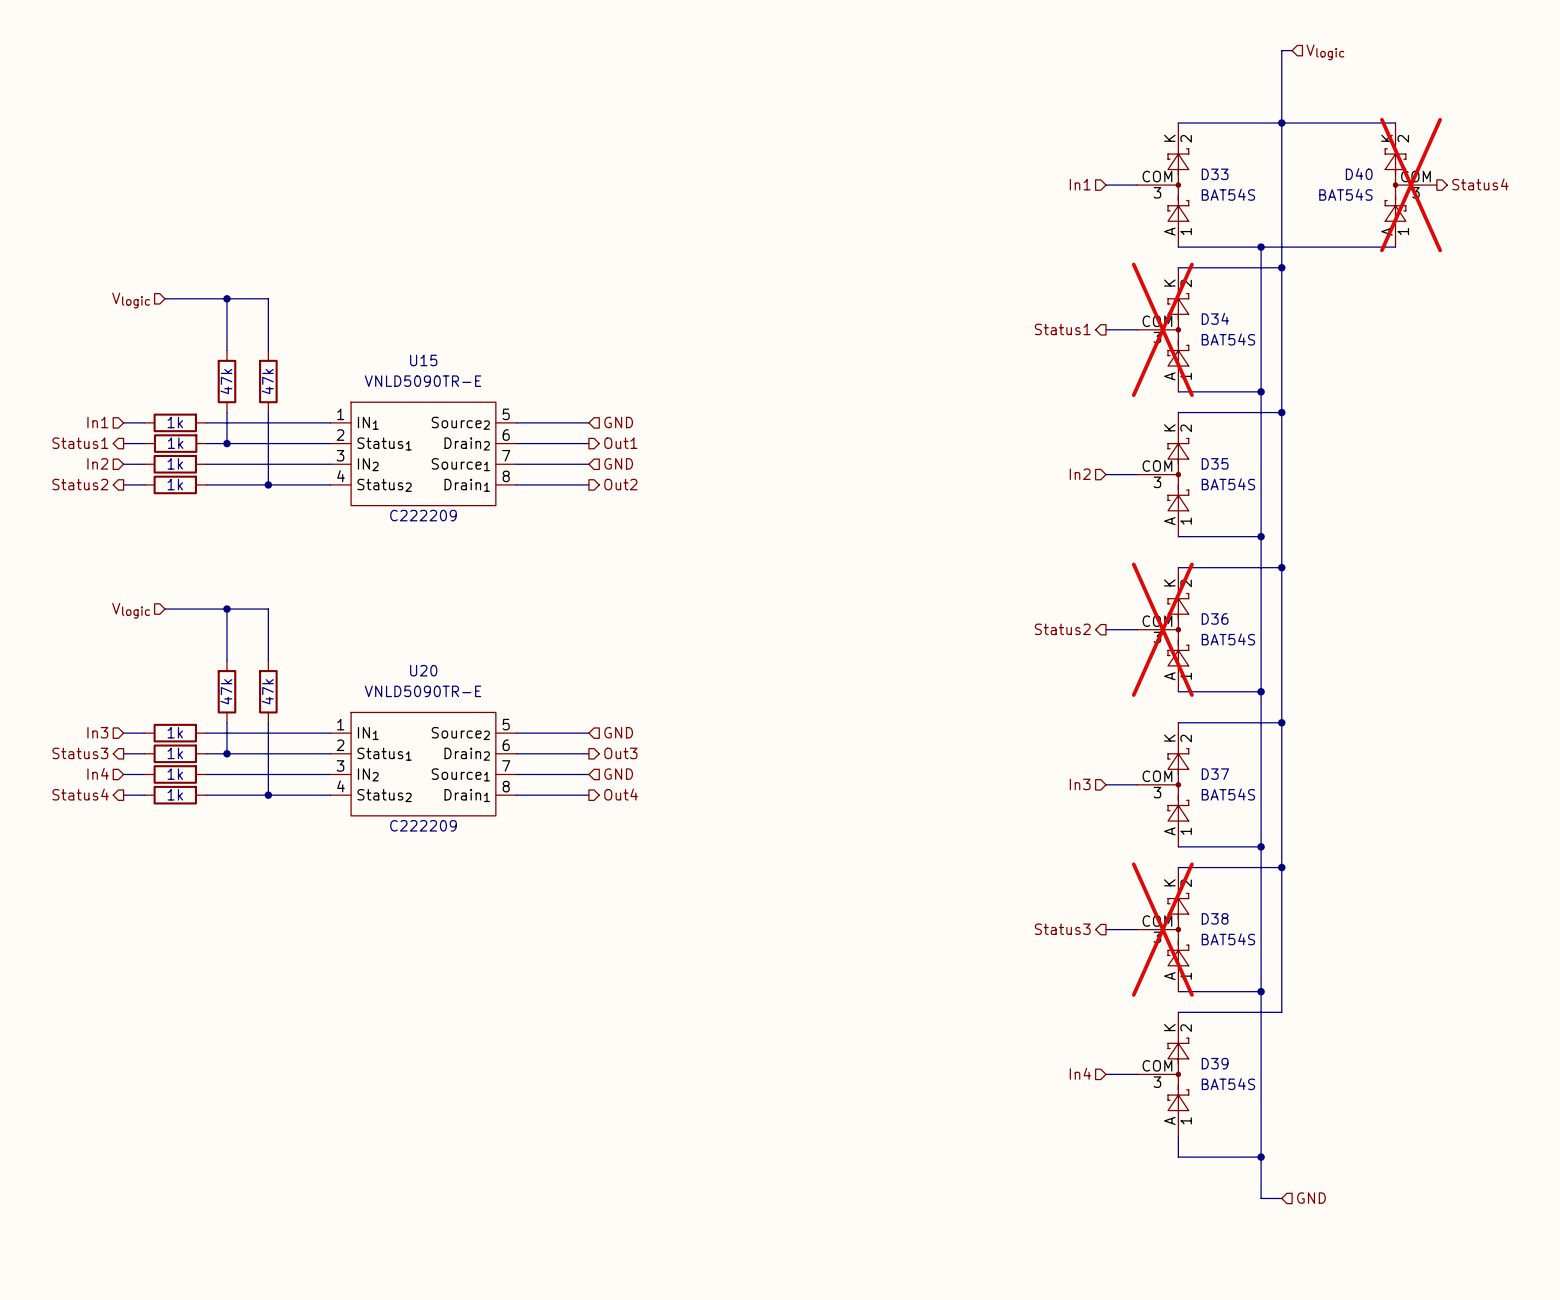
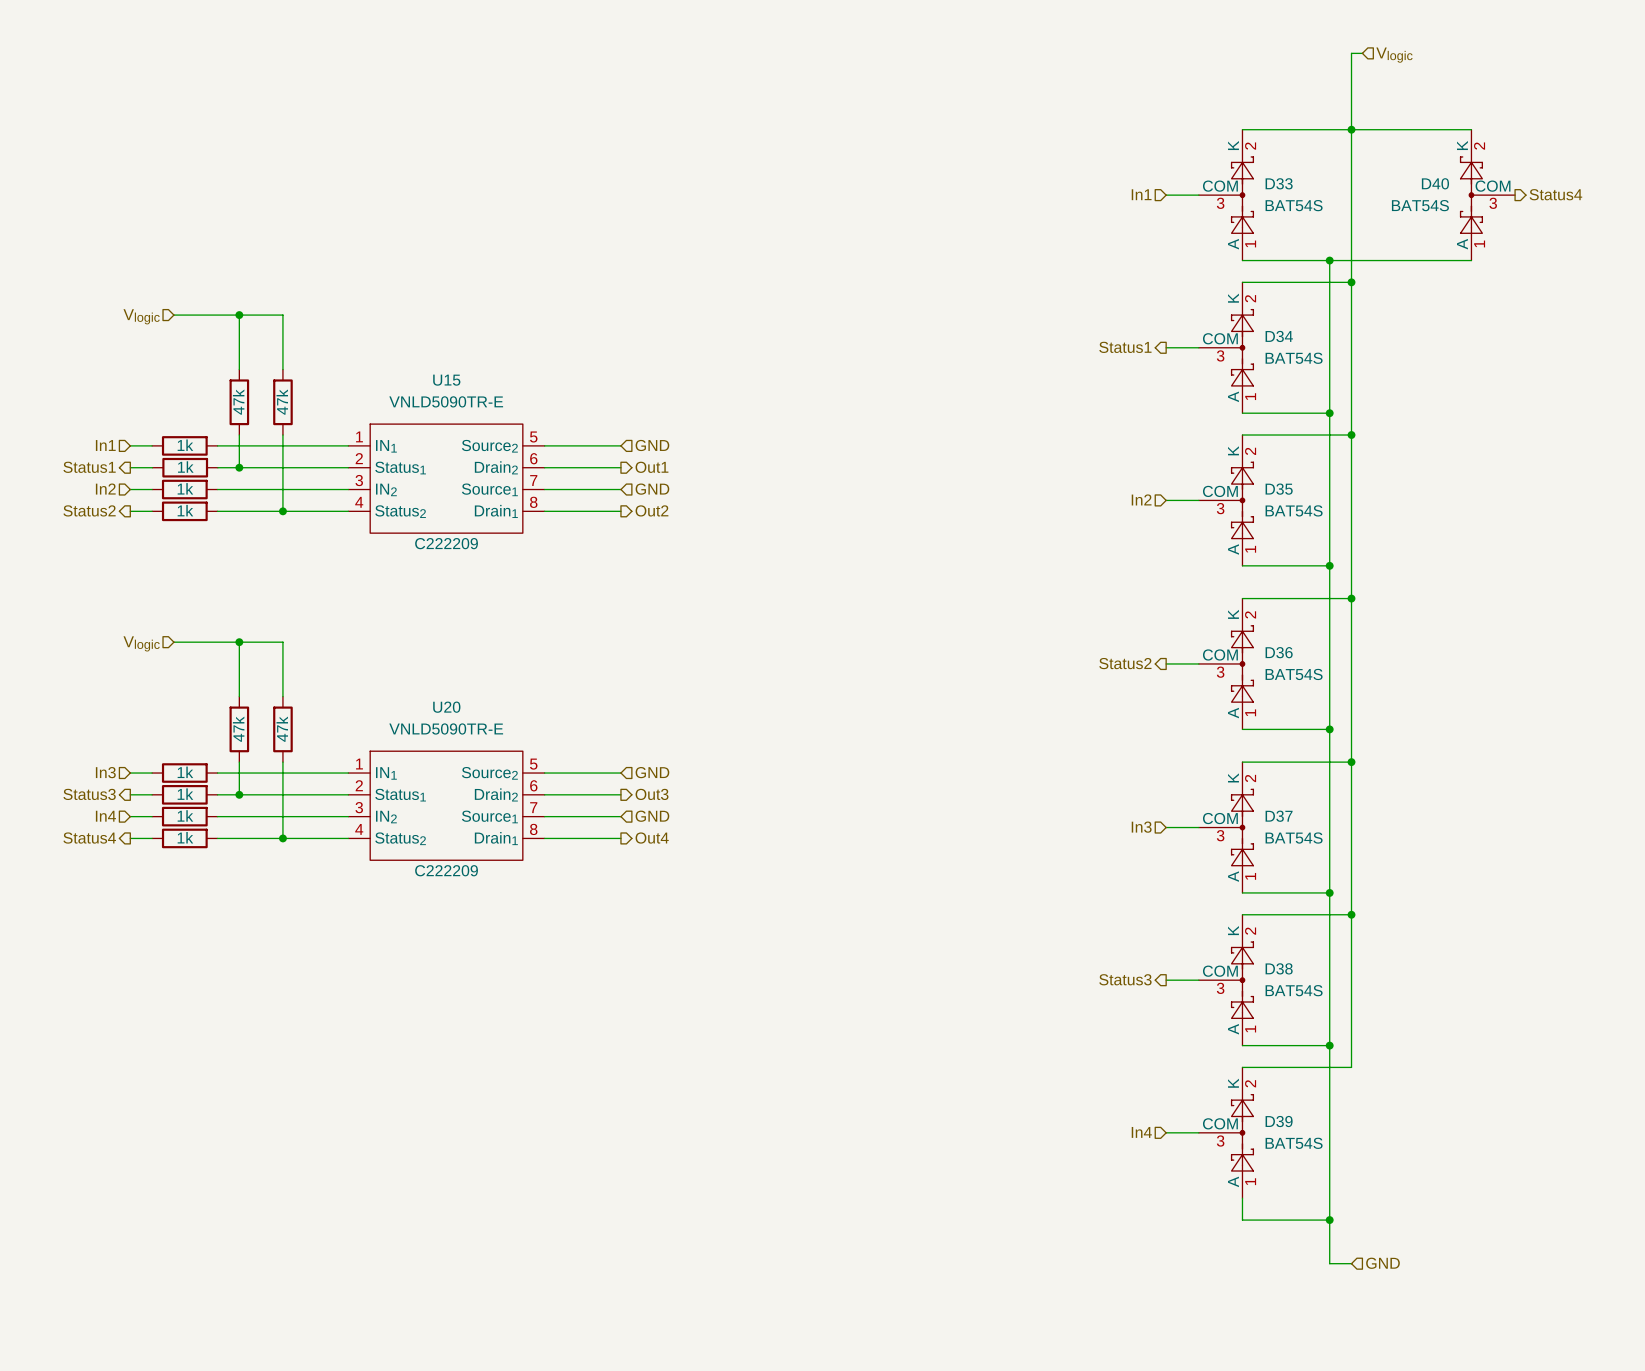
D40 do-not-place cross: (1411, 185) -> none
D34 do-not-place cross: (1162, 329) -> none
D36 do-not-place cross: (1162, 629) -> none
D38 do-not-place cross: (1162, 929) -> none

